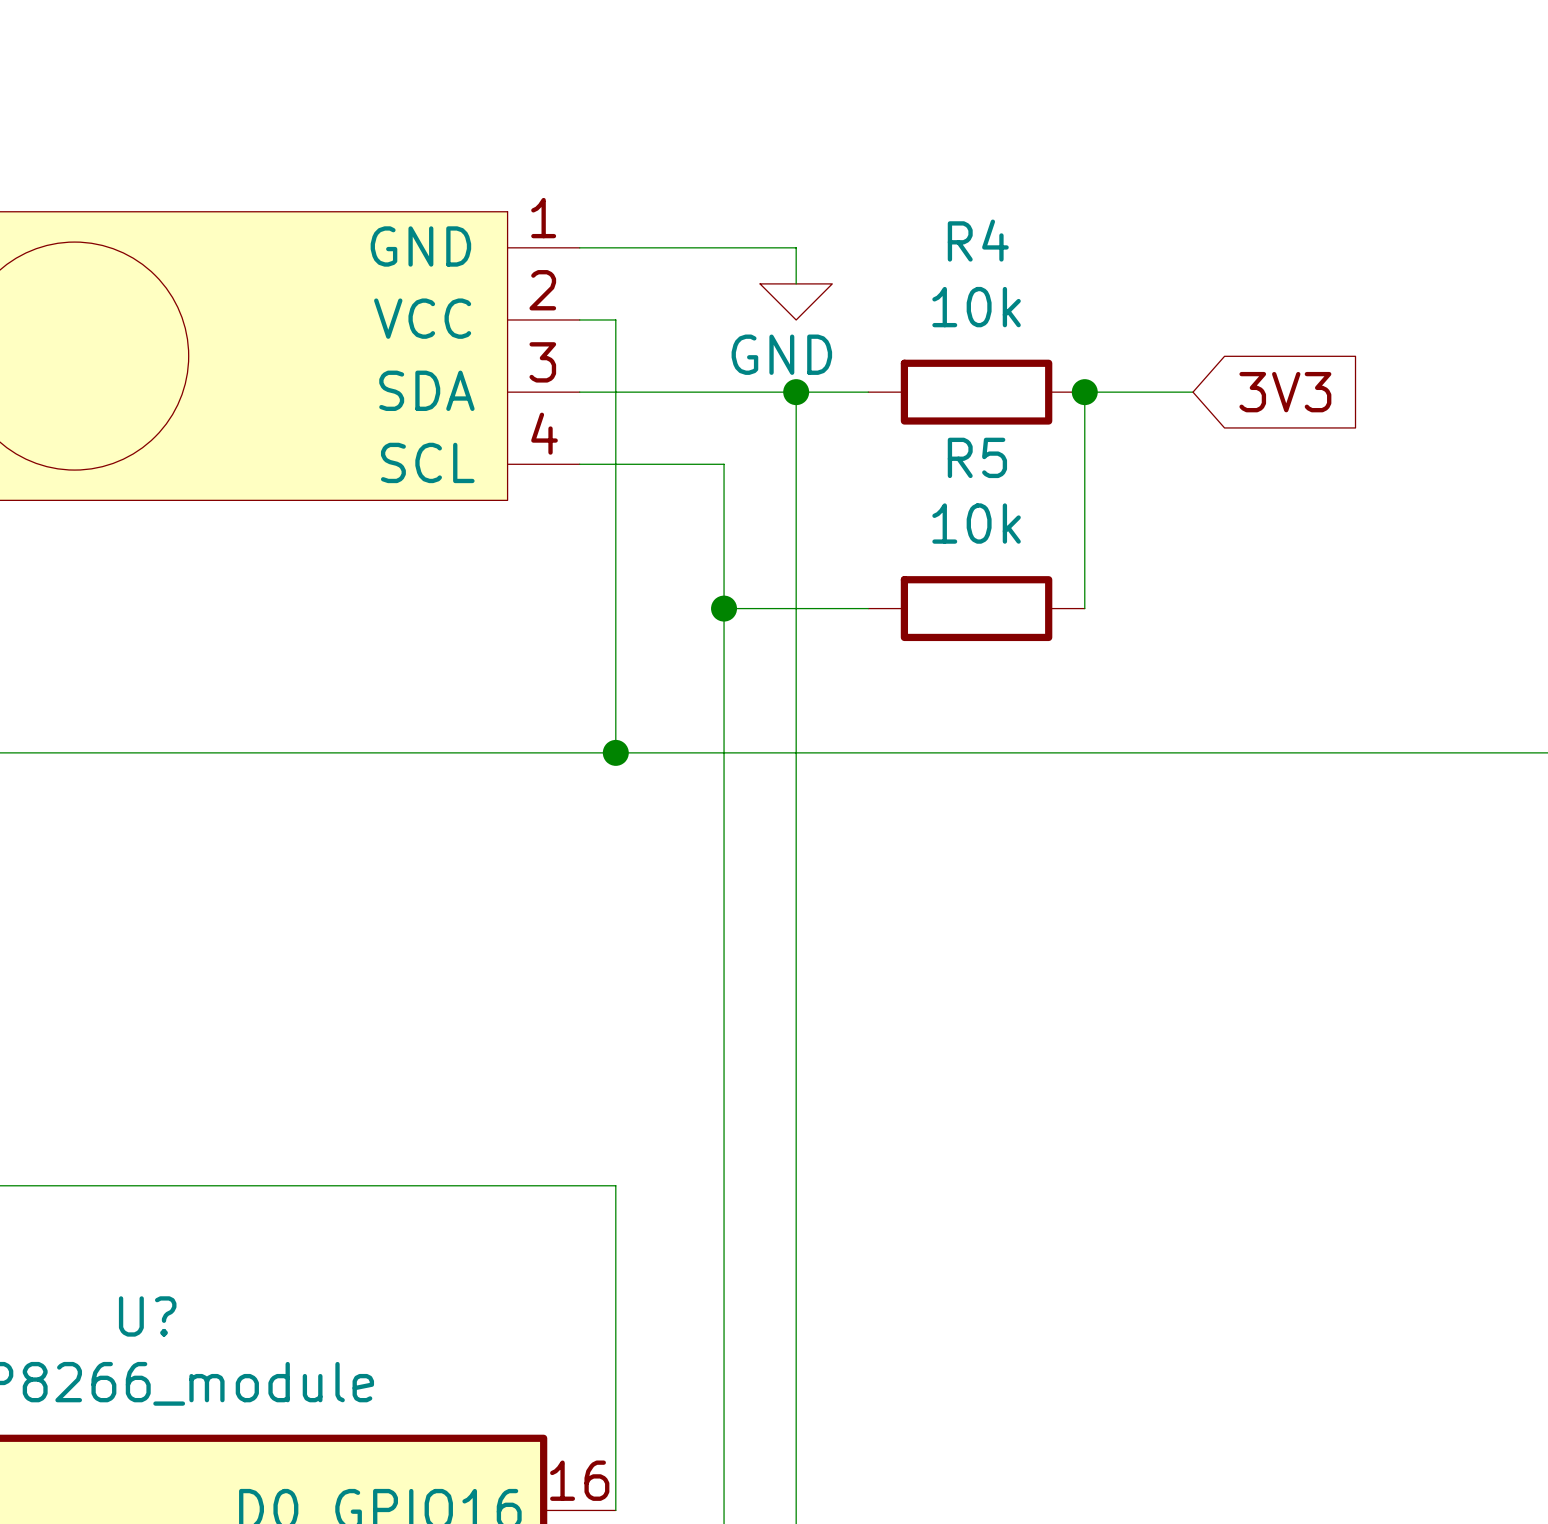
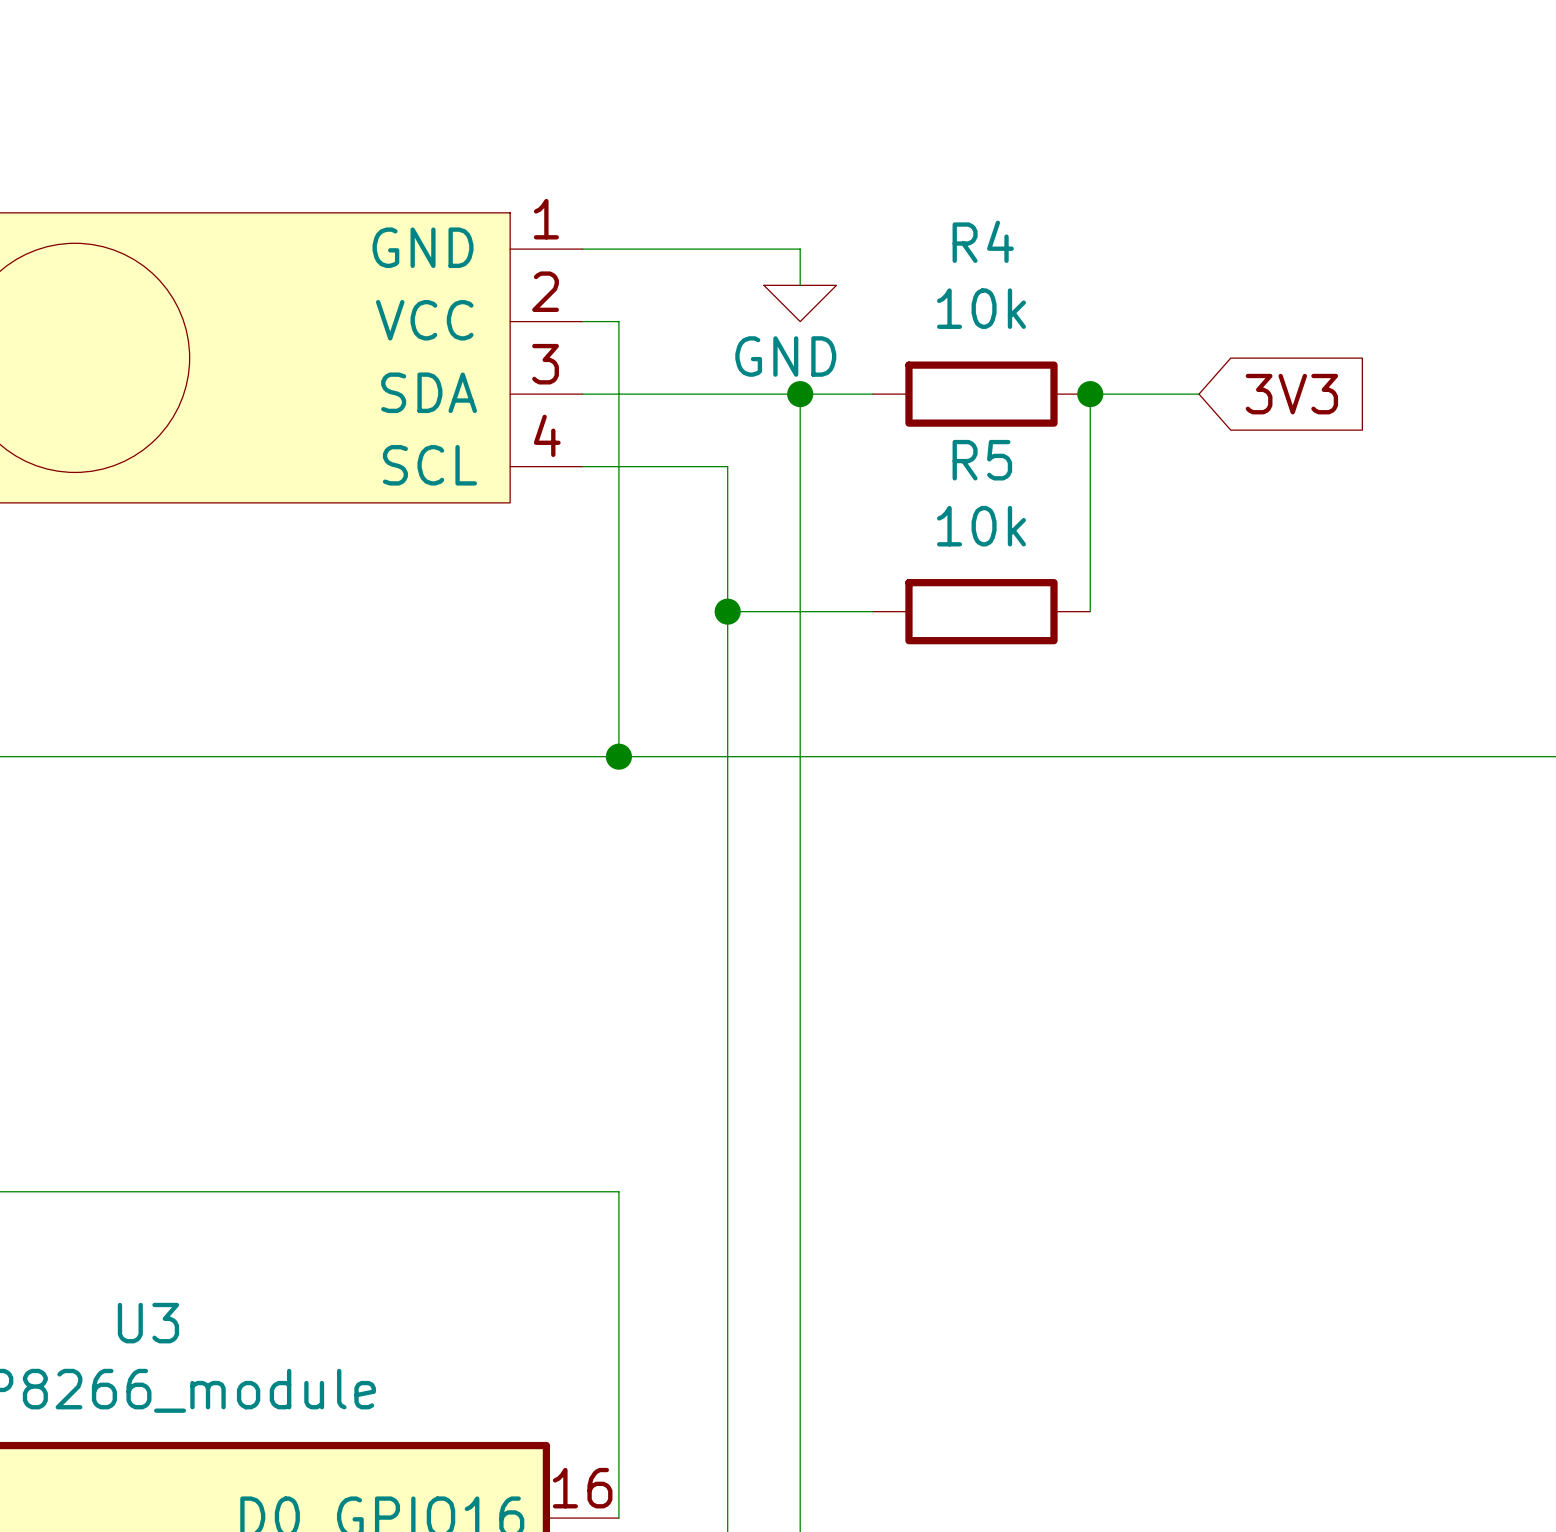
U? name: U? (147, 1316) -> U3 (148, 1323)

